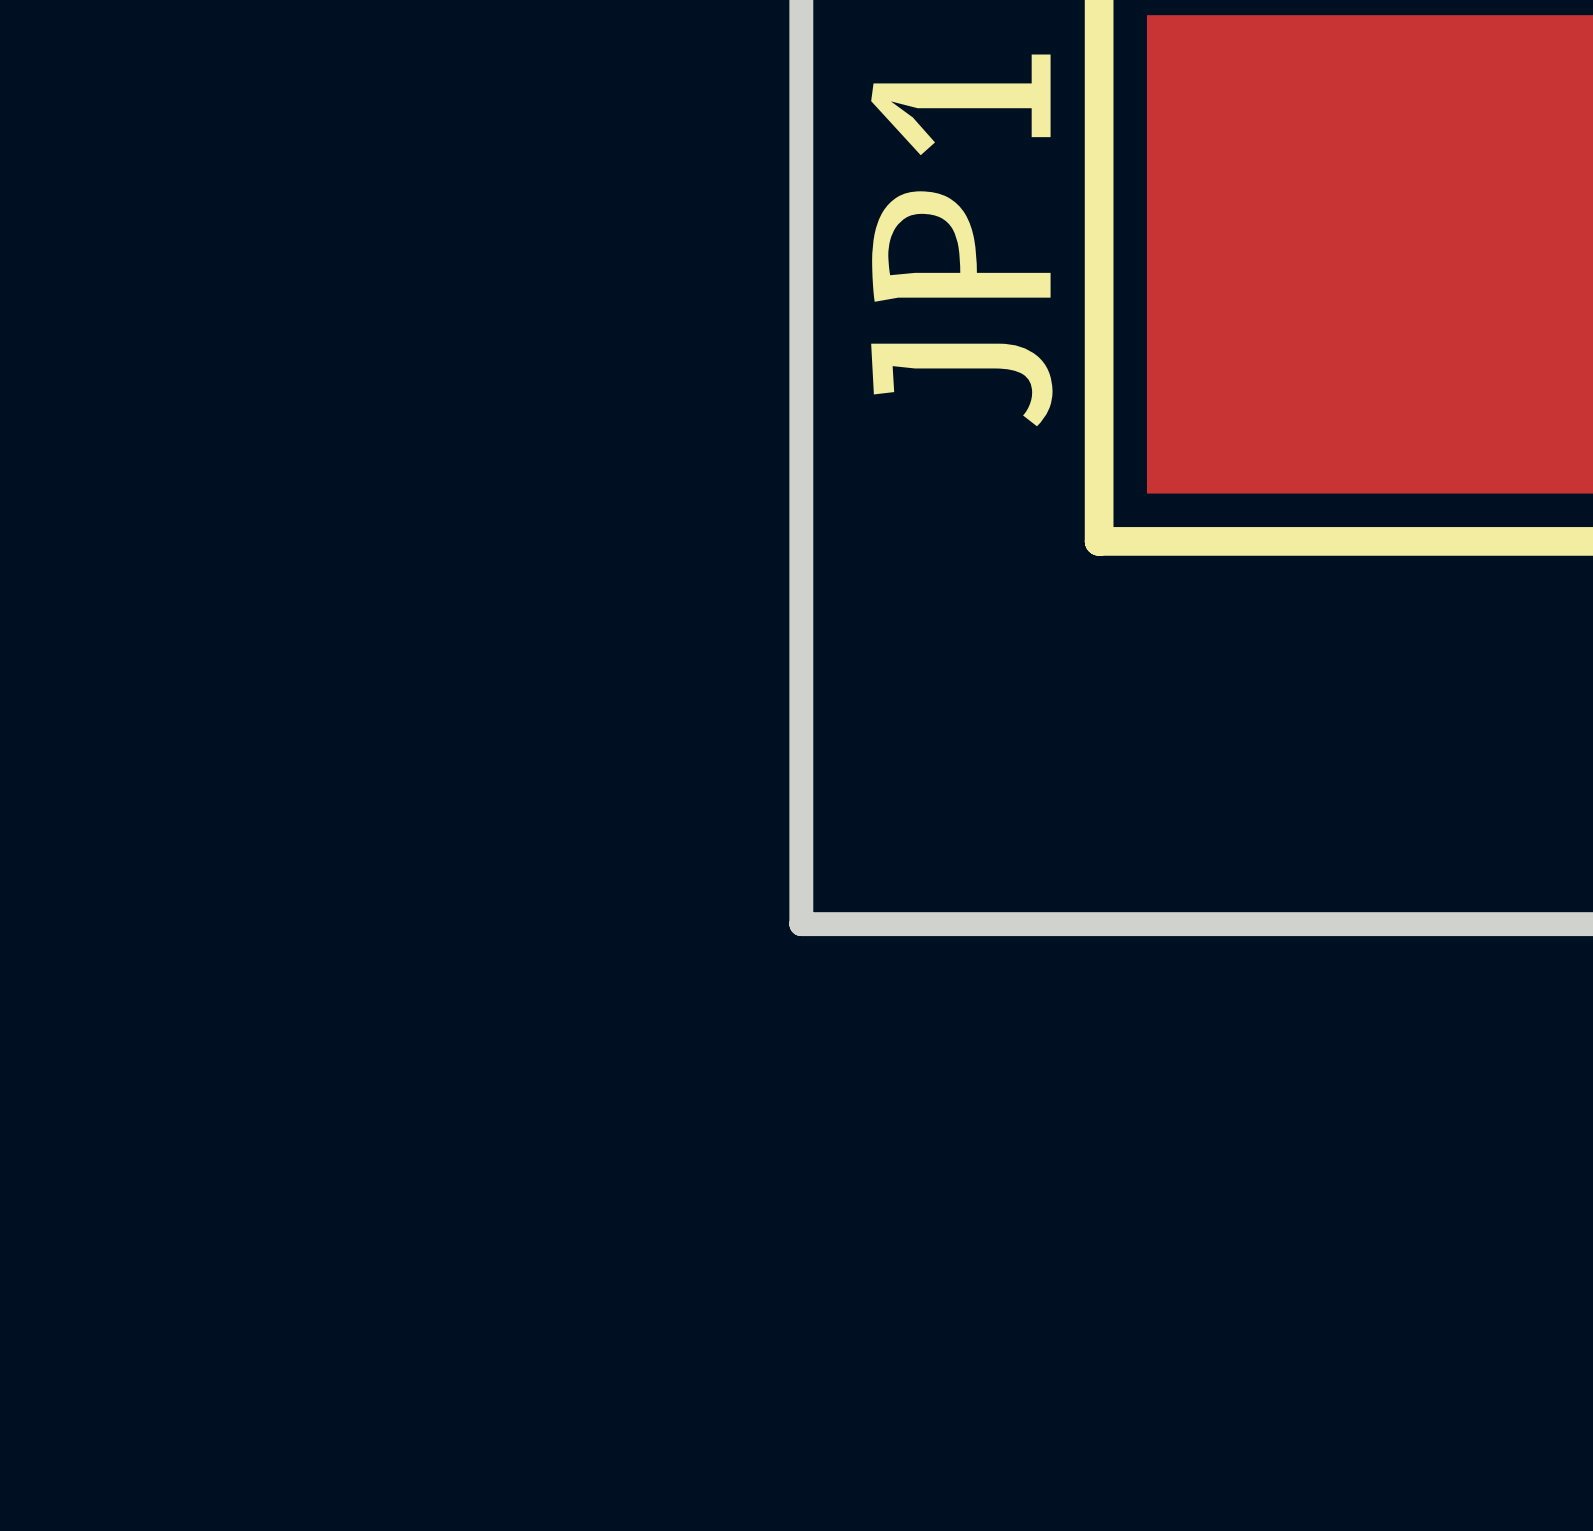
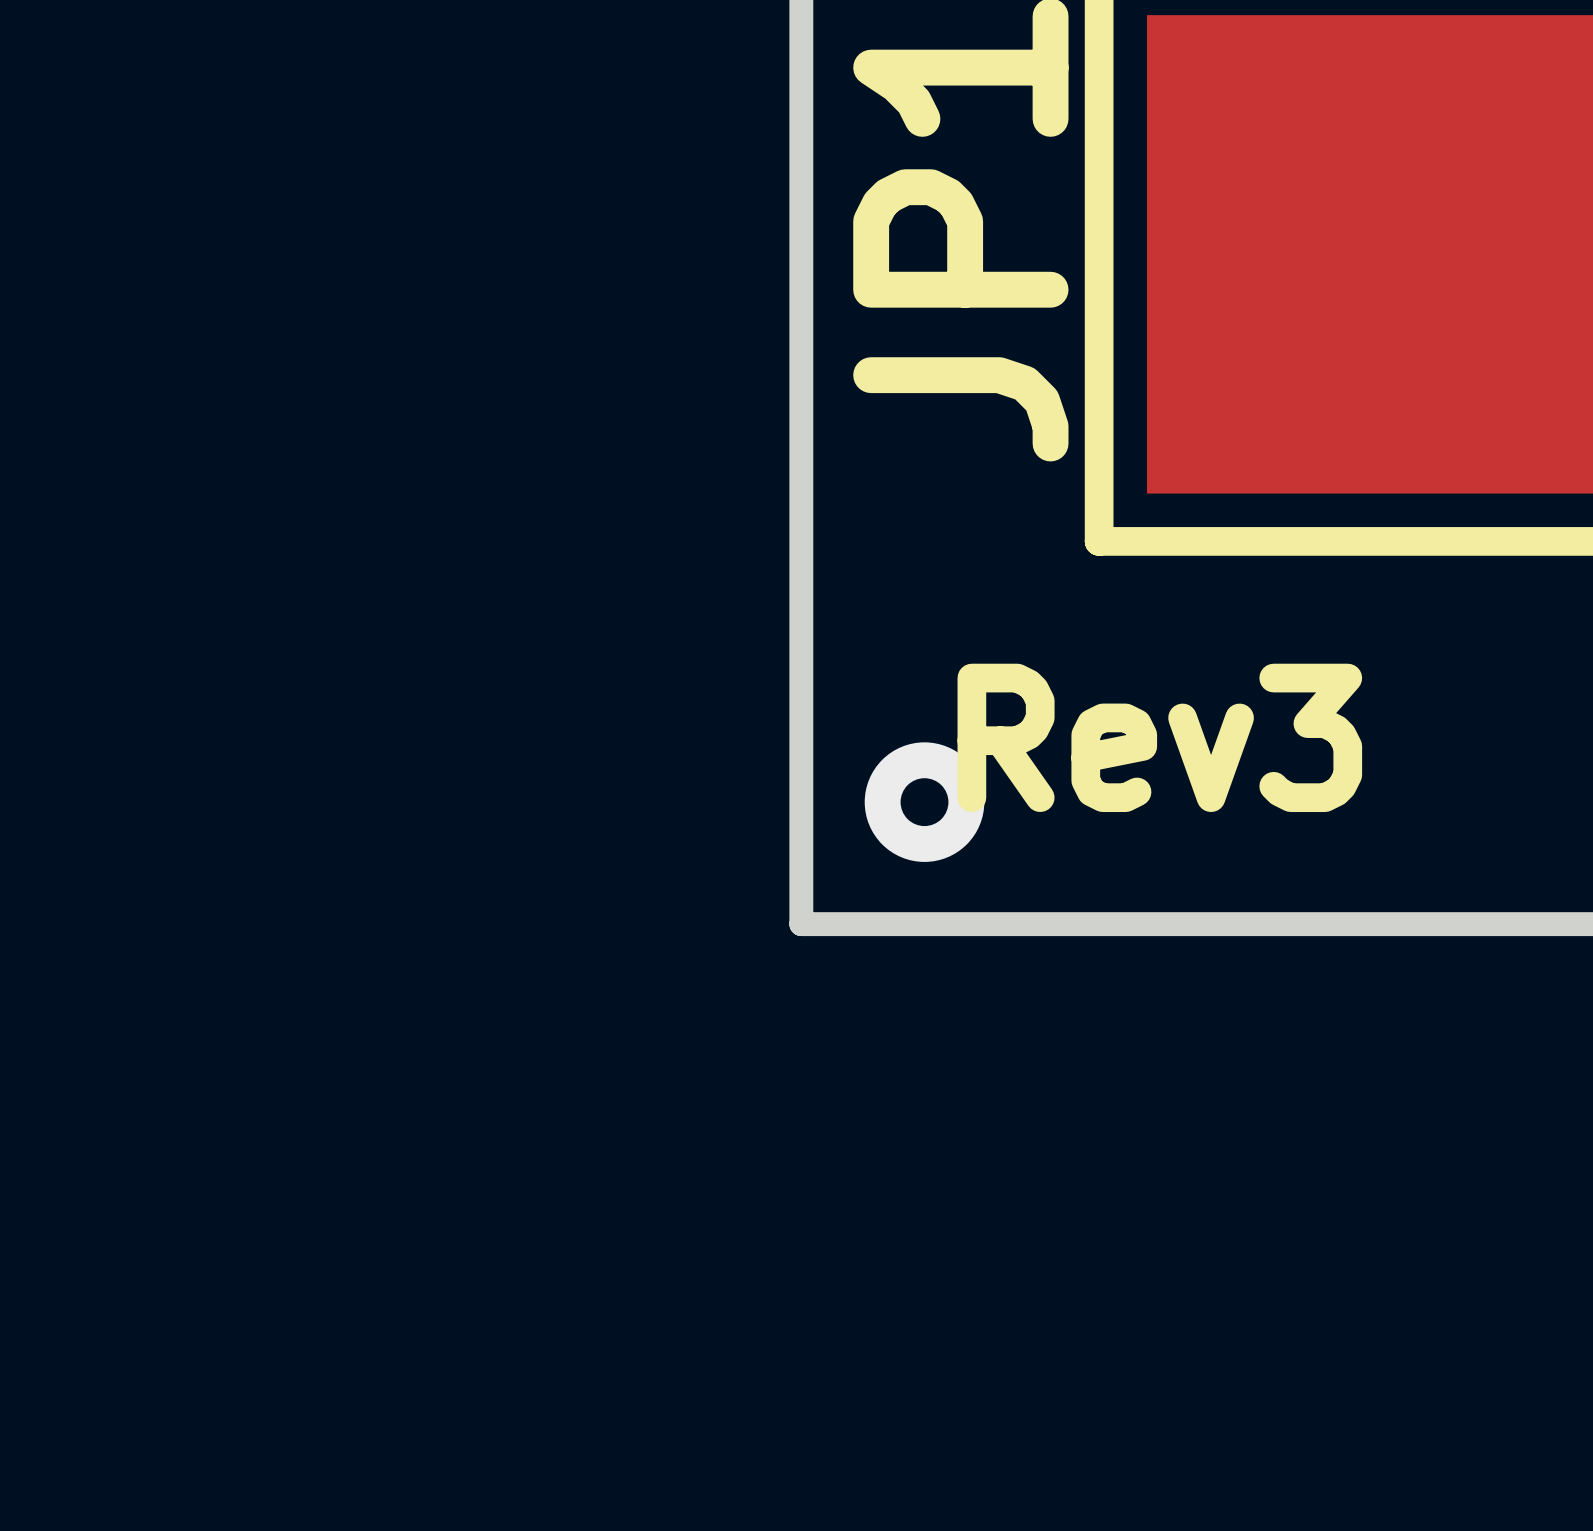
text: none -> Rev3 (1159, 737)
via: none -> (924, 802)

